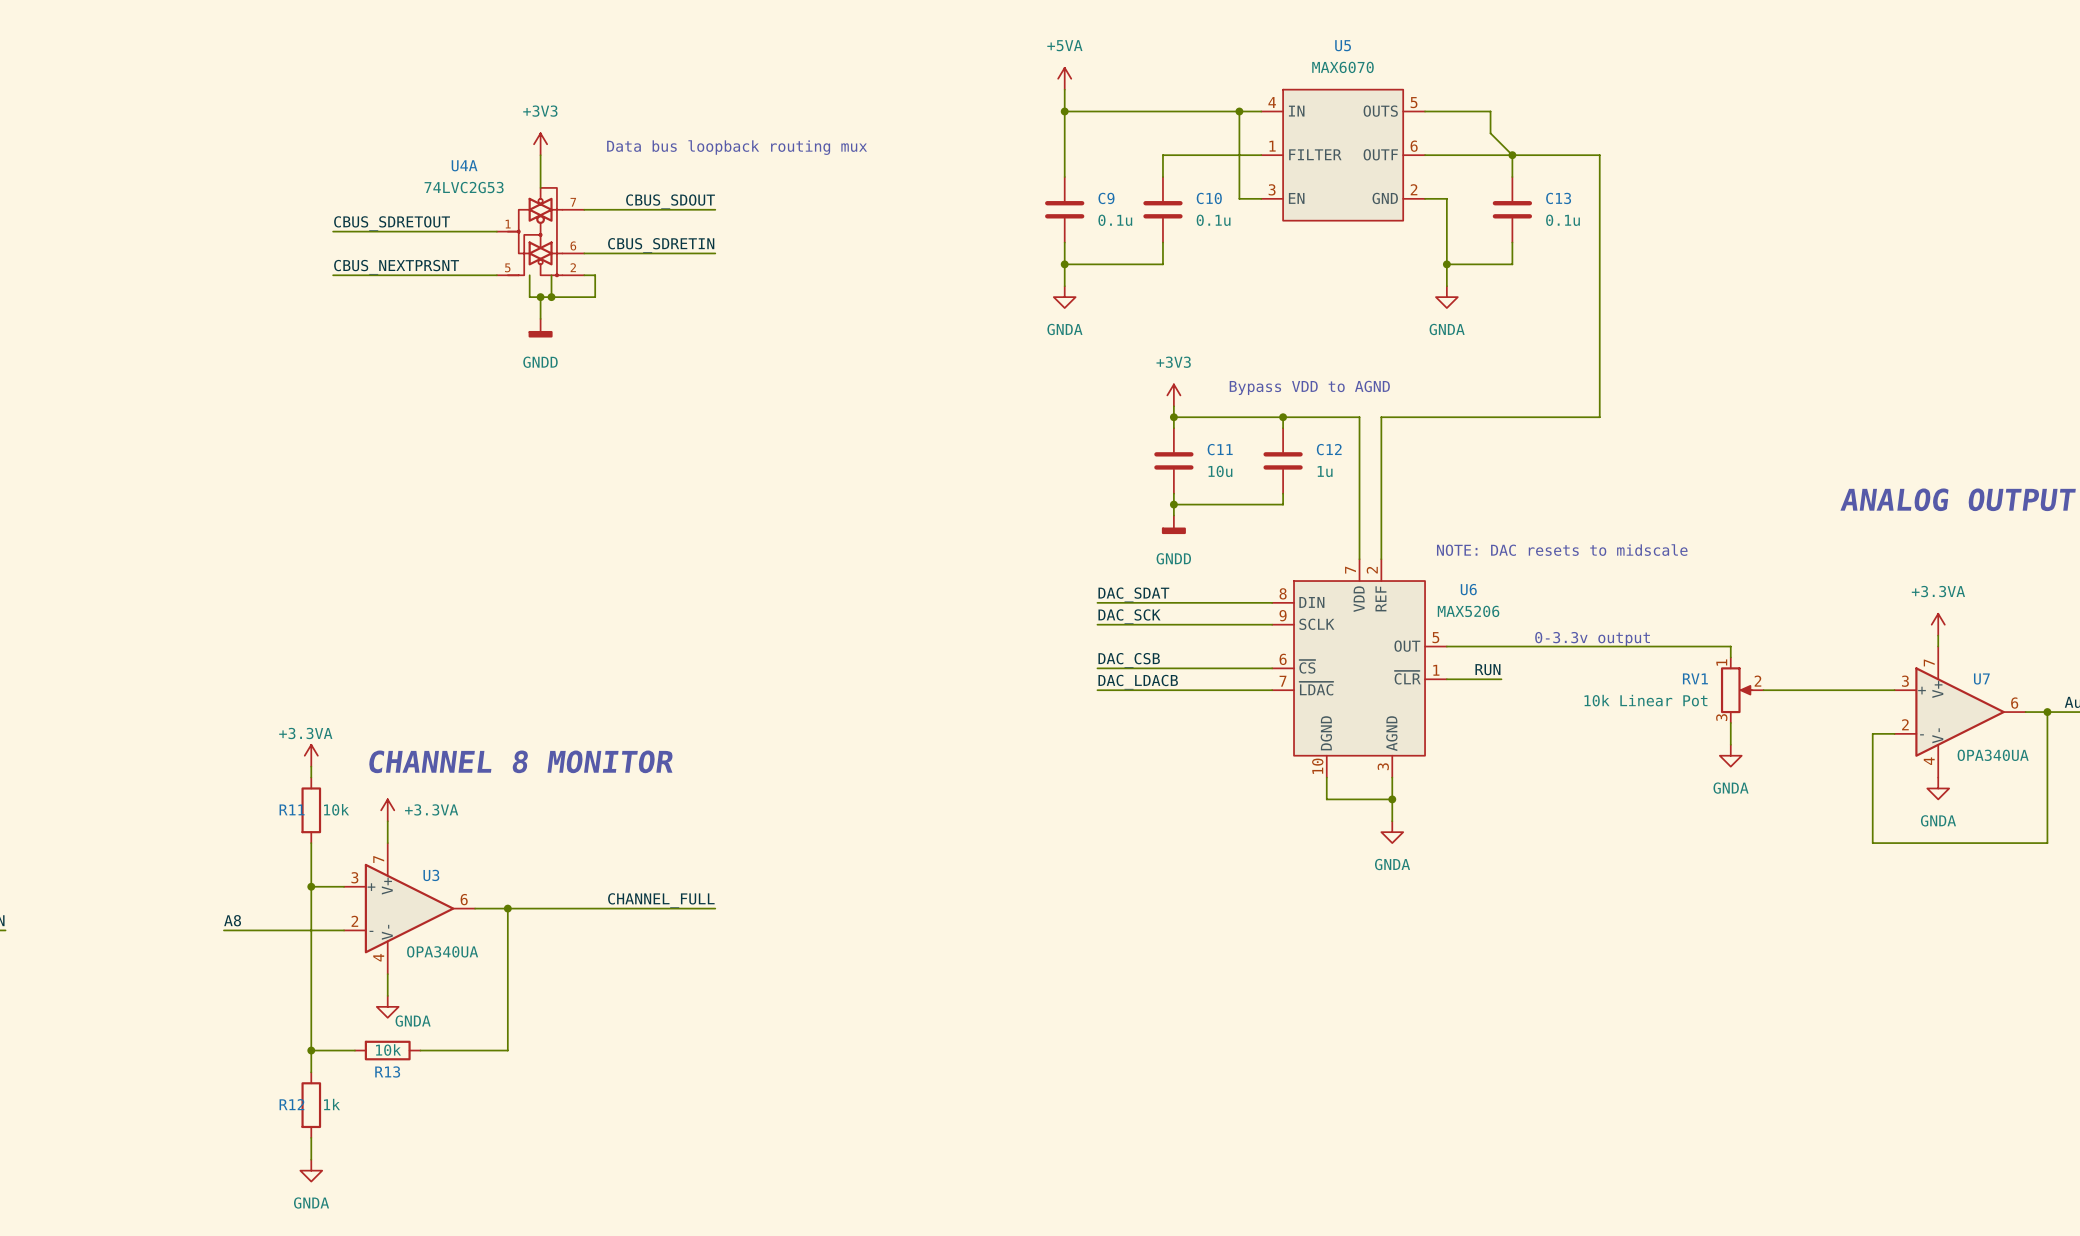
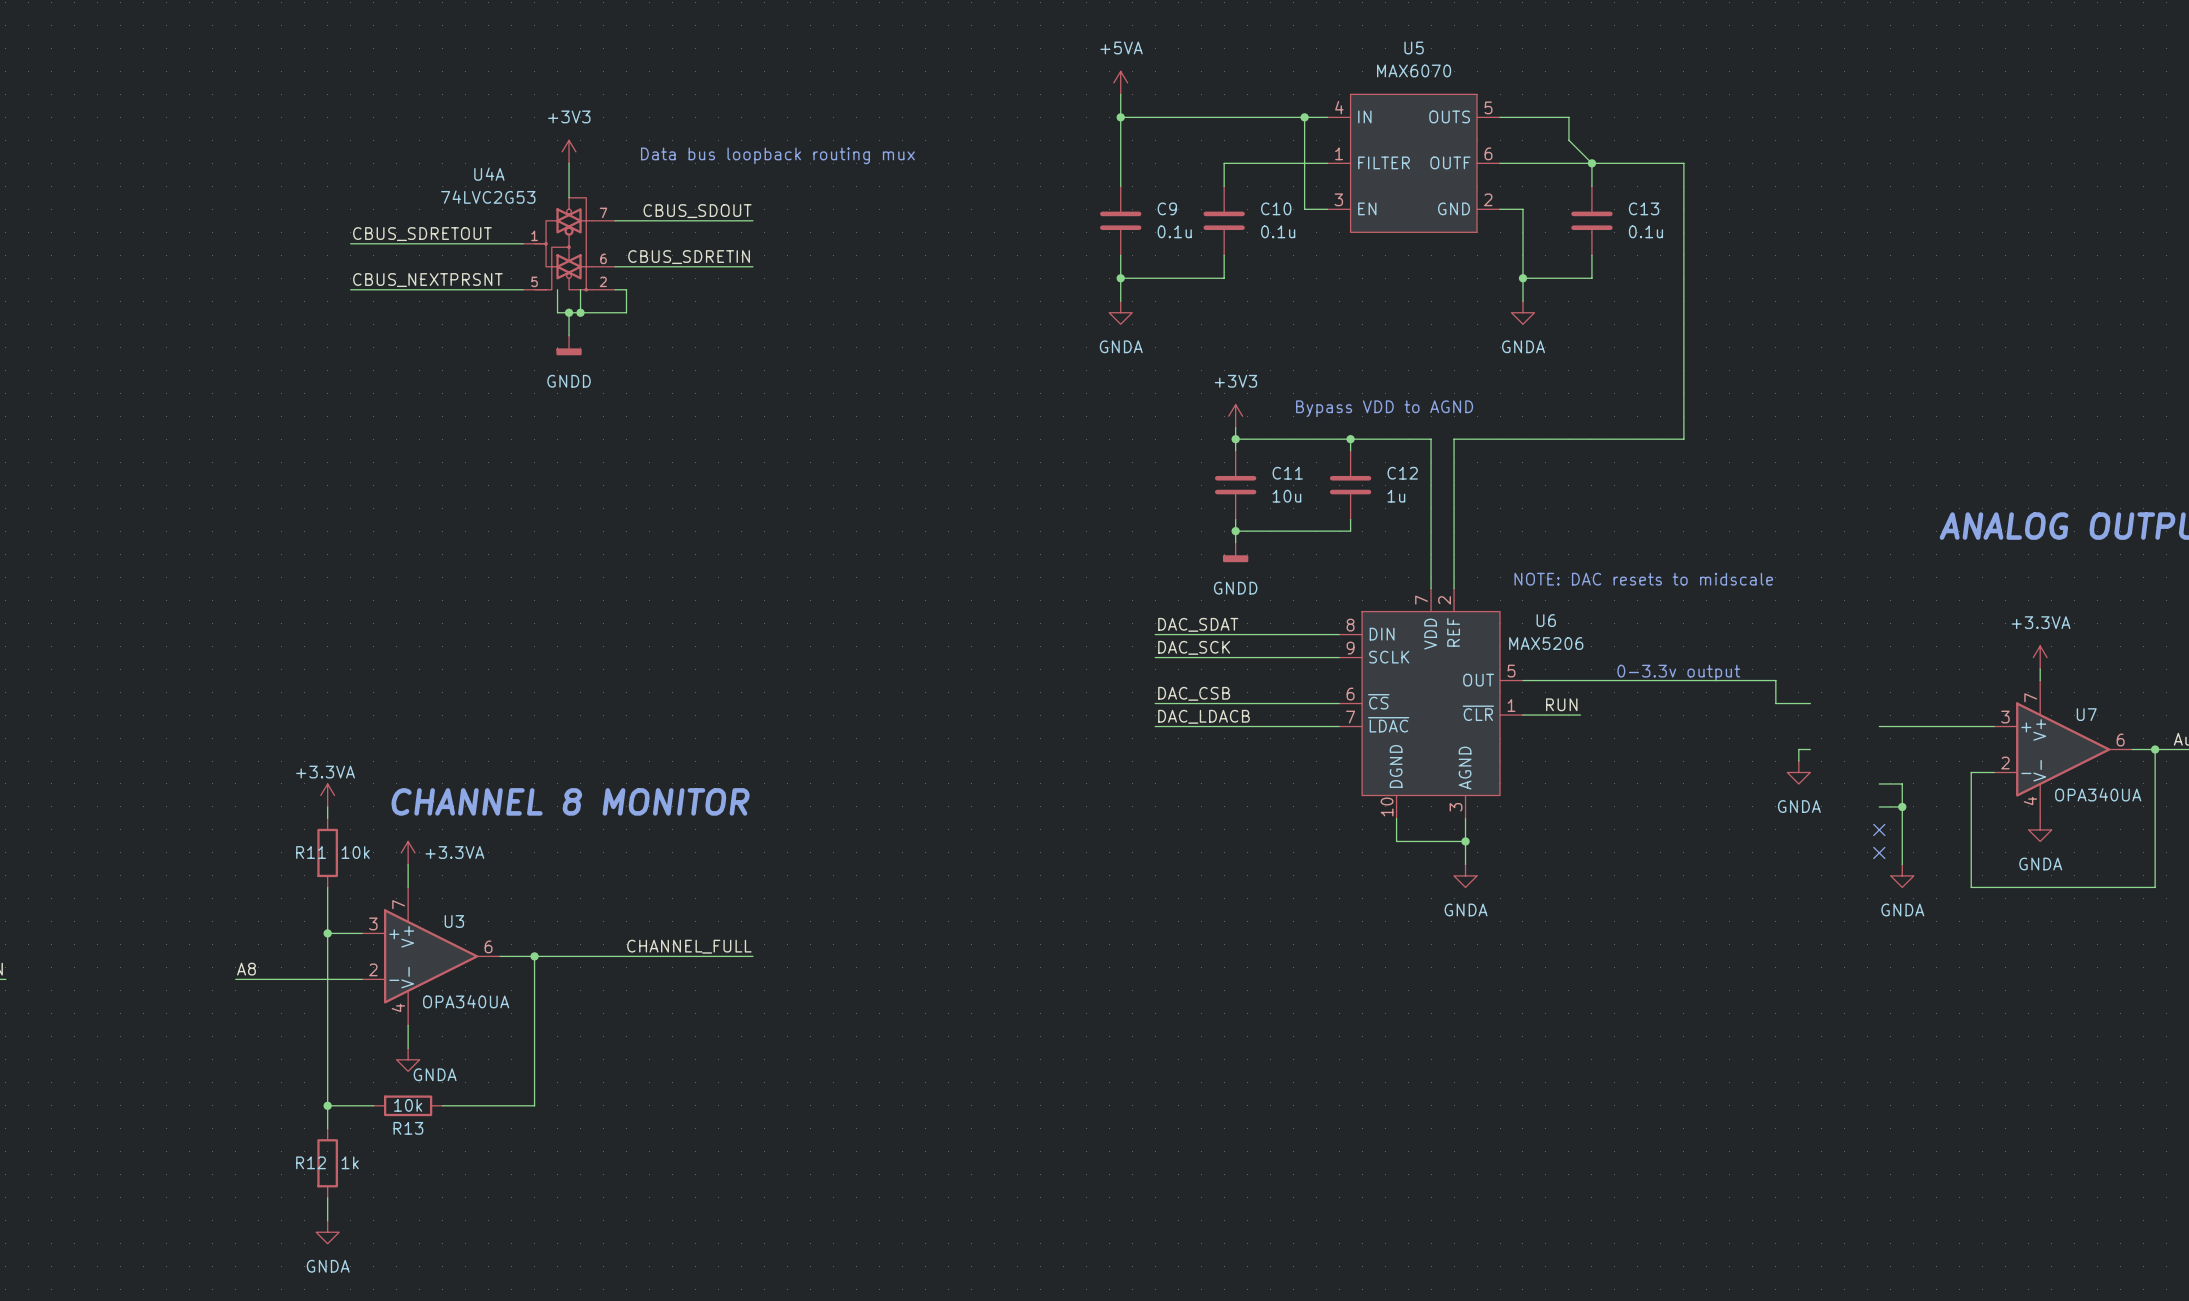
wire: (1687, 646) (1730, 646) (1730, 657) -> (1775, 680) (1775, 703) (1810, 703)
RV1: 10k Linear Pot (1742, 690) -> none
wire: (1763, 690) (1785, 690) -> (1879, 806) (1902, 806)
wire: none -> (1810, 749) (1798, 749) (1798, 761)
wire: (1730, 722) (1730, 744) -> none
wire: none -> (1879, 783) (1902, 783) (1902, 864)
power symbol position: GNDA (1730, 755) -> GNDA (1798, 772)
junction: none -> (1902, 806)
no-connect mark: none -> (1879, 829)
no-connect mark: none -> (1879, 852)
power symbol: none -> GNDA (1902, 875)

